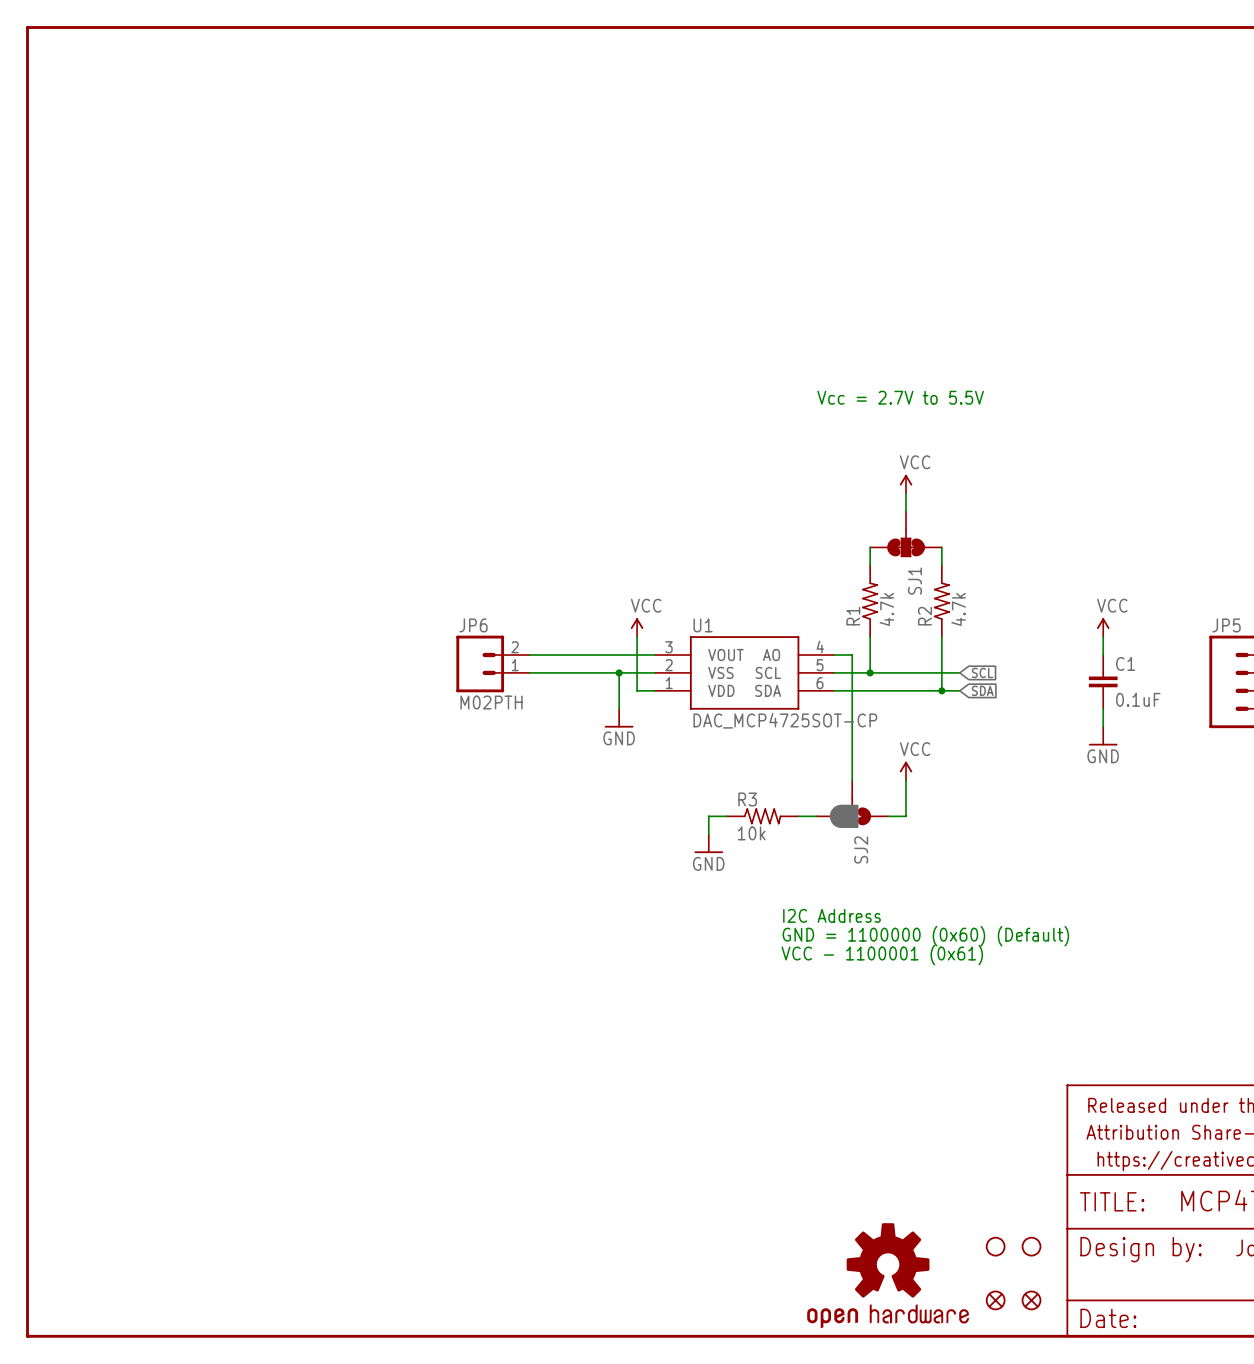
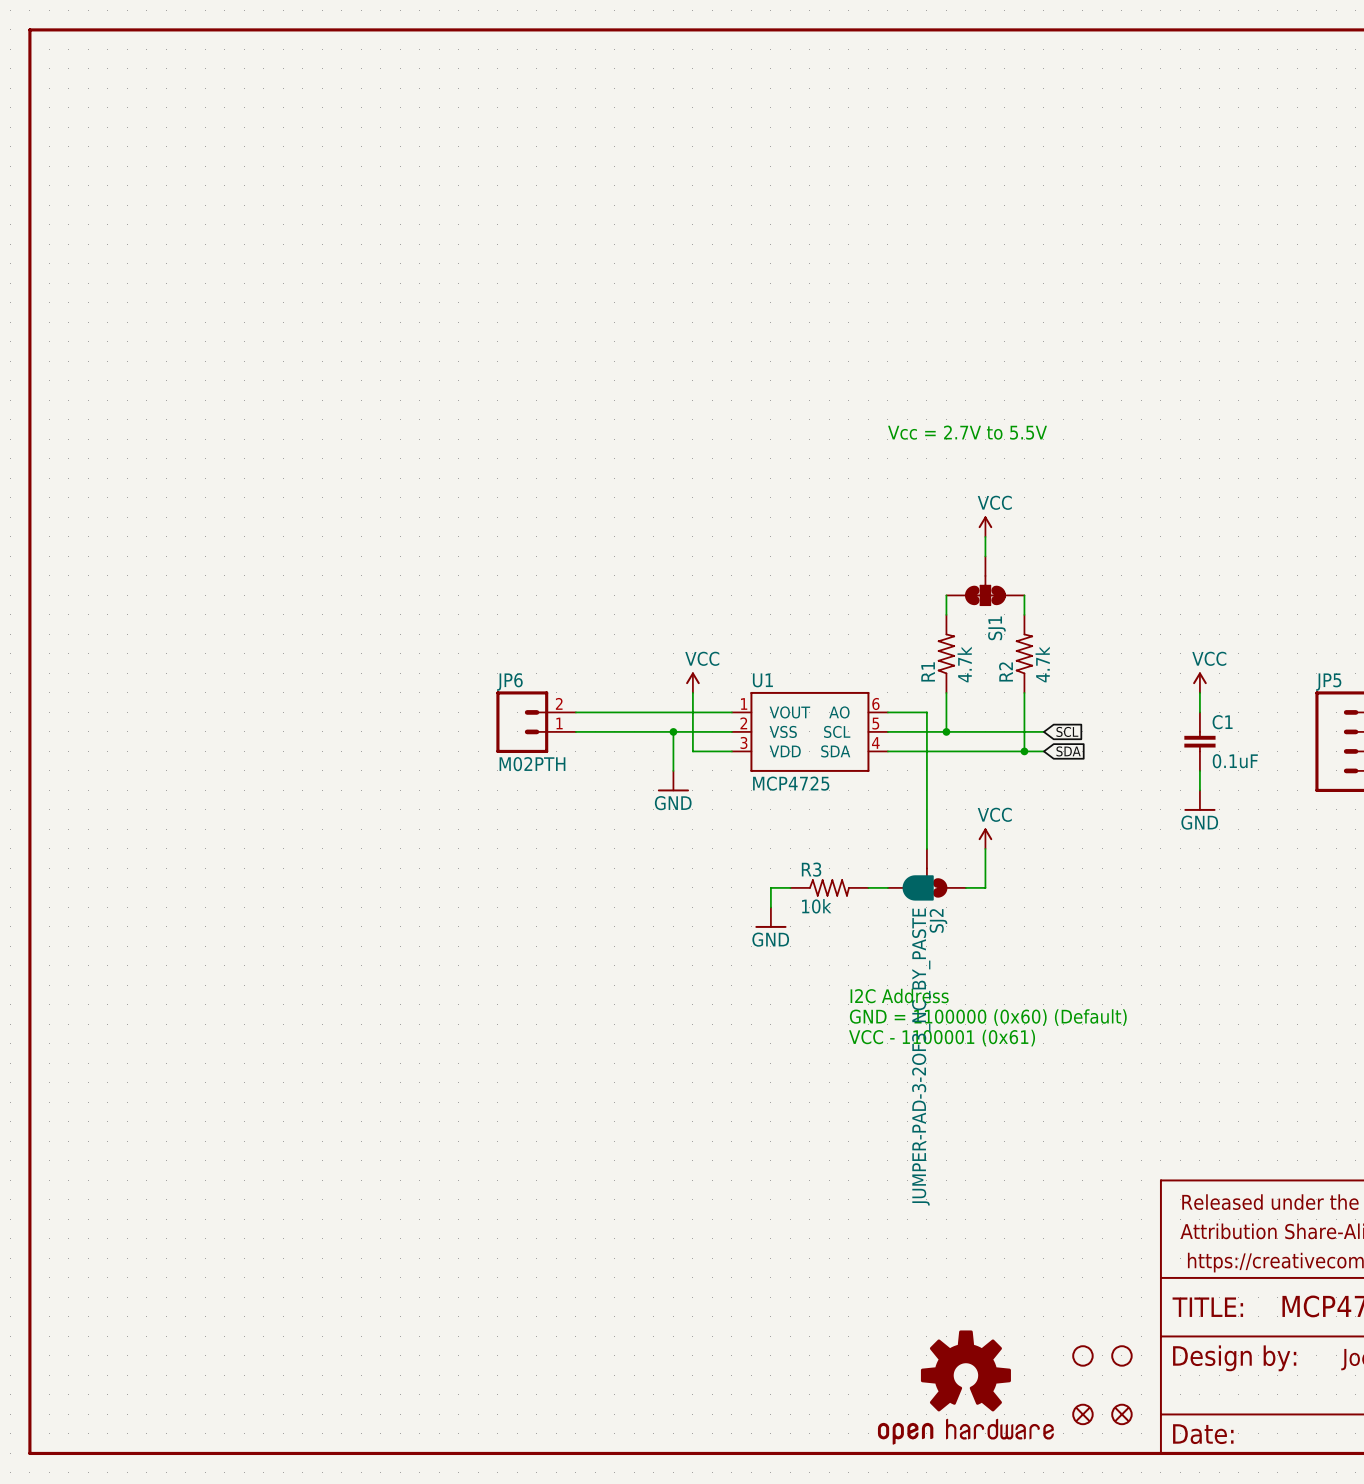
U1 symbol: [655, 636, 835, 710] -> [731, 691, 888, 772]
U1 value: DAC_MCP4725SOT-CP (785, 720) -> MCP4725 (791, 783)
SJ2 value: none -> JUMPER-PAD-3-2OF3_NC_BY_PASTE (921, 1057)

